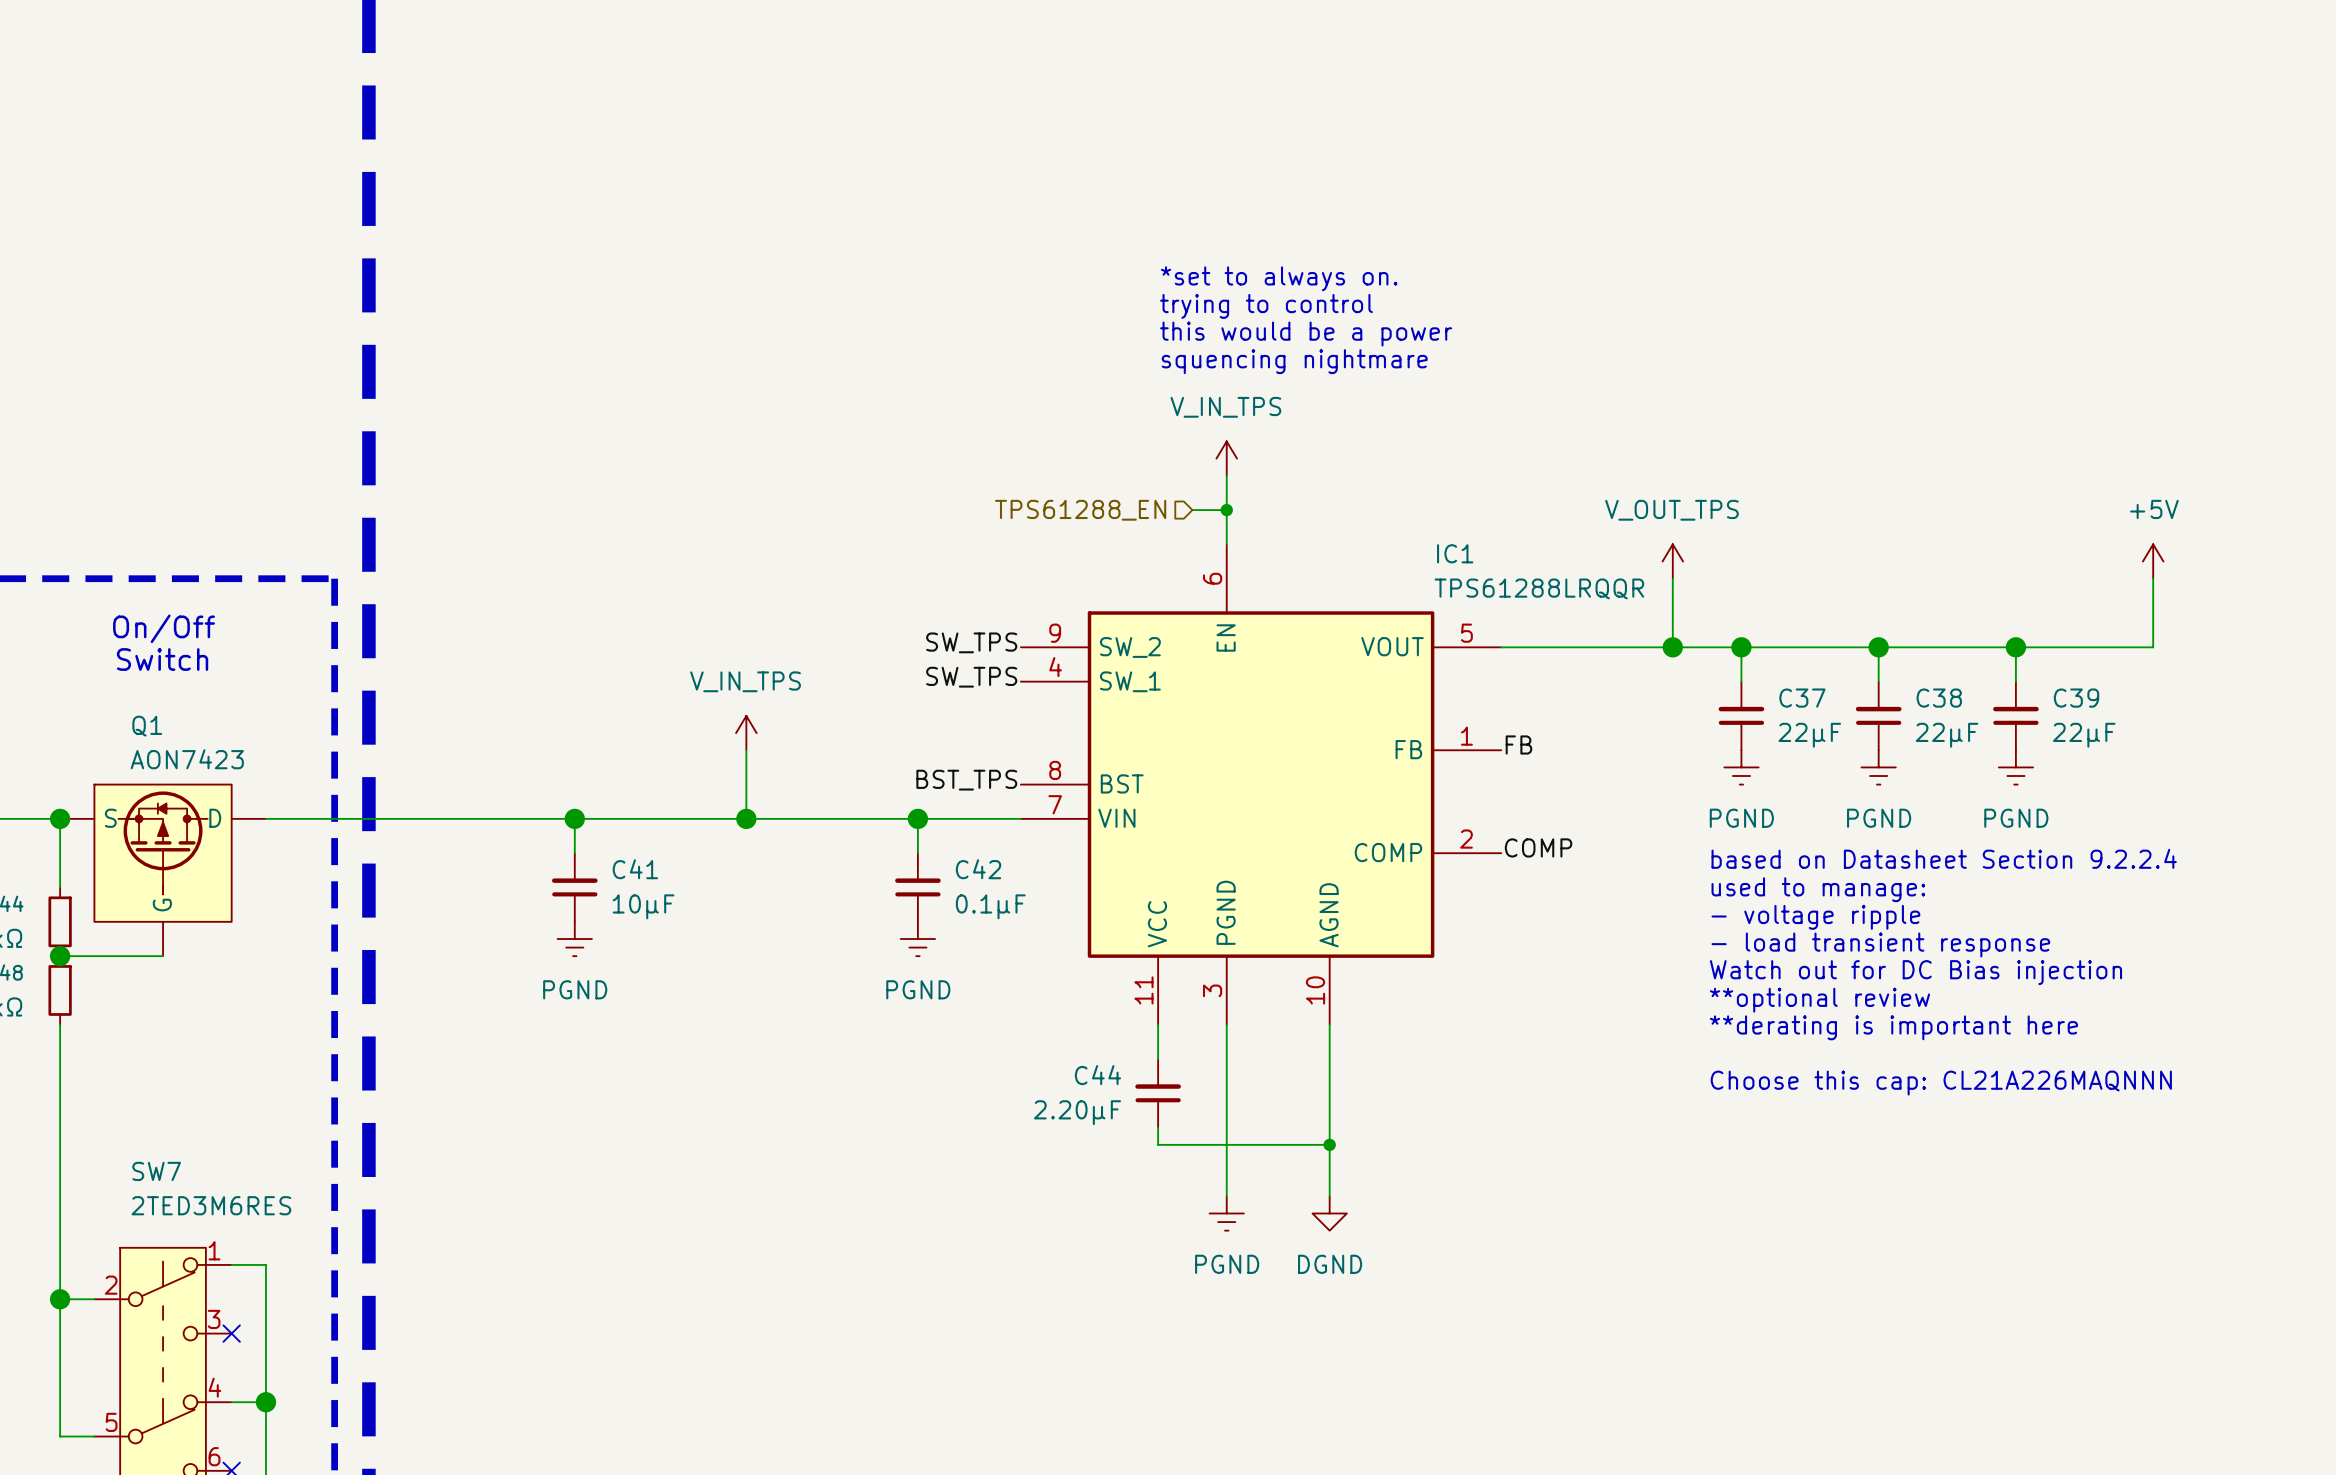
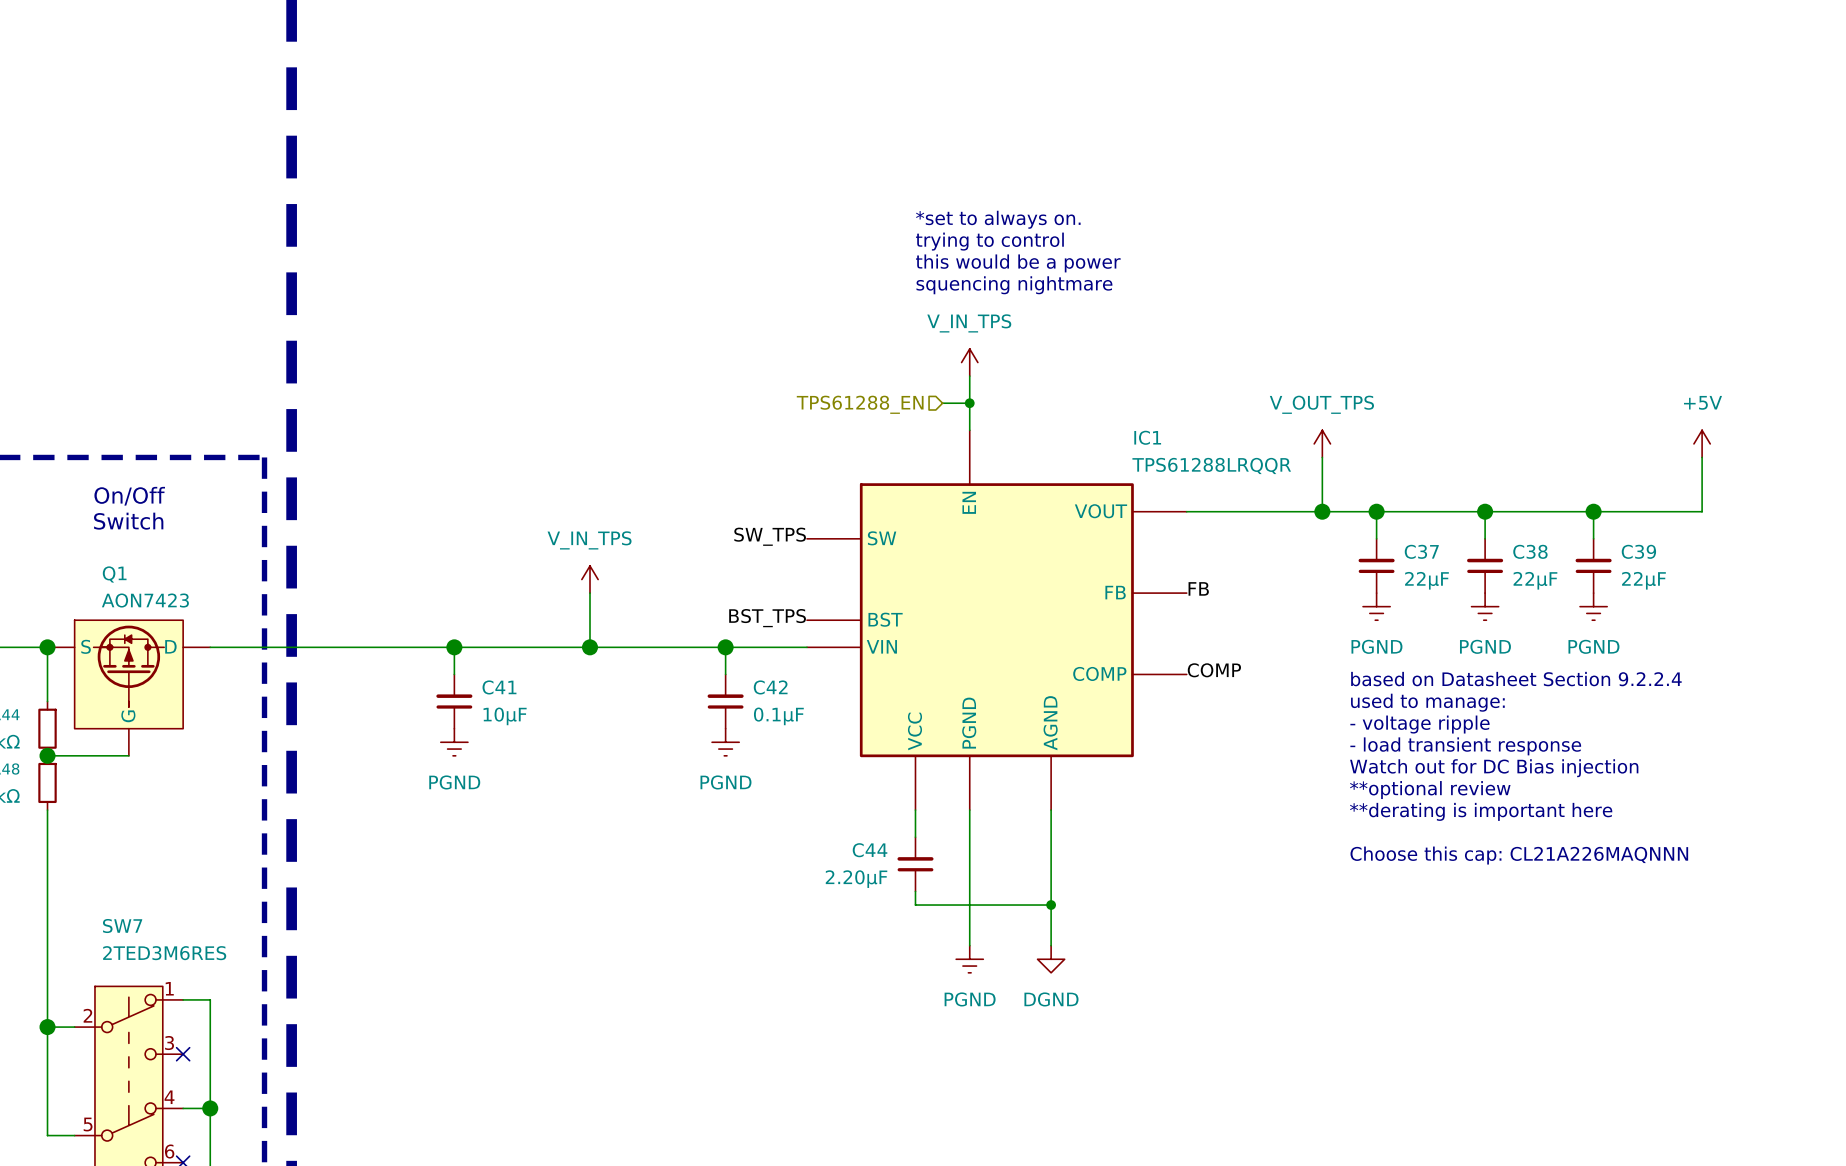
IC1 symbol: [1020, 544, 1502, 1025] -> [806, 430, 1187, 811]
label: SW_TPS (971, 642) -> none

